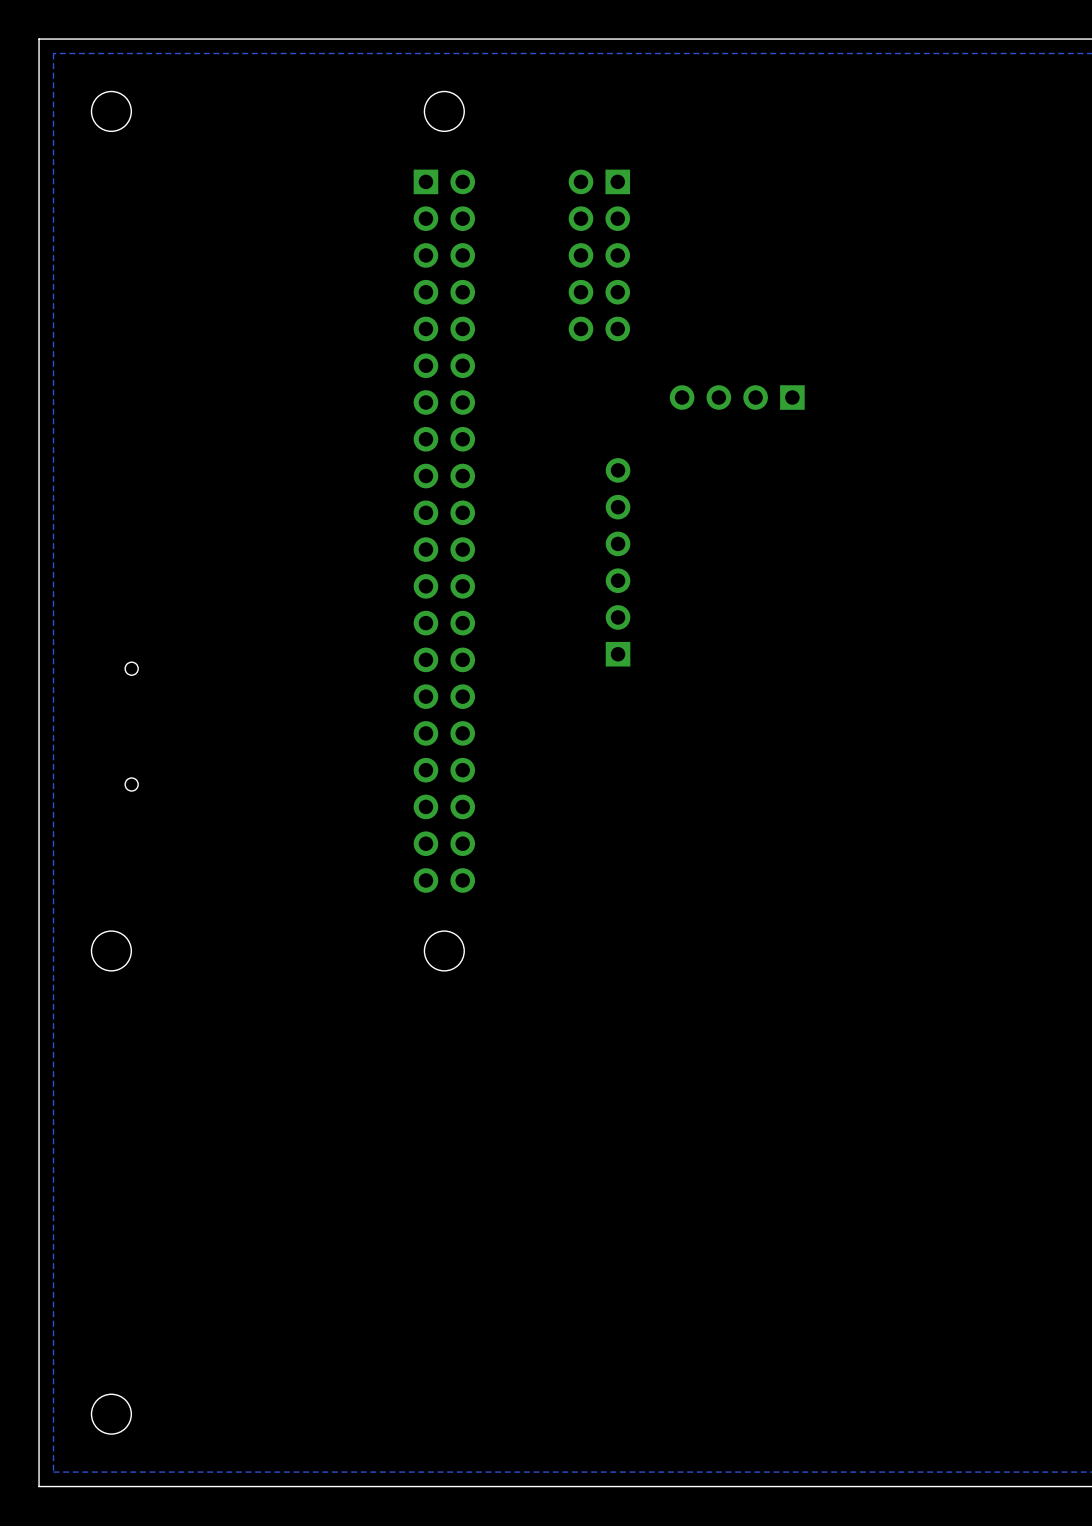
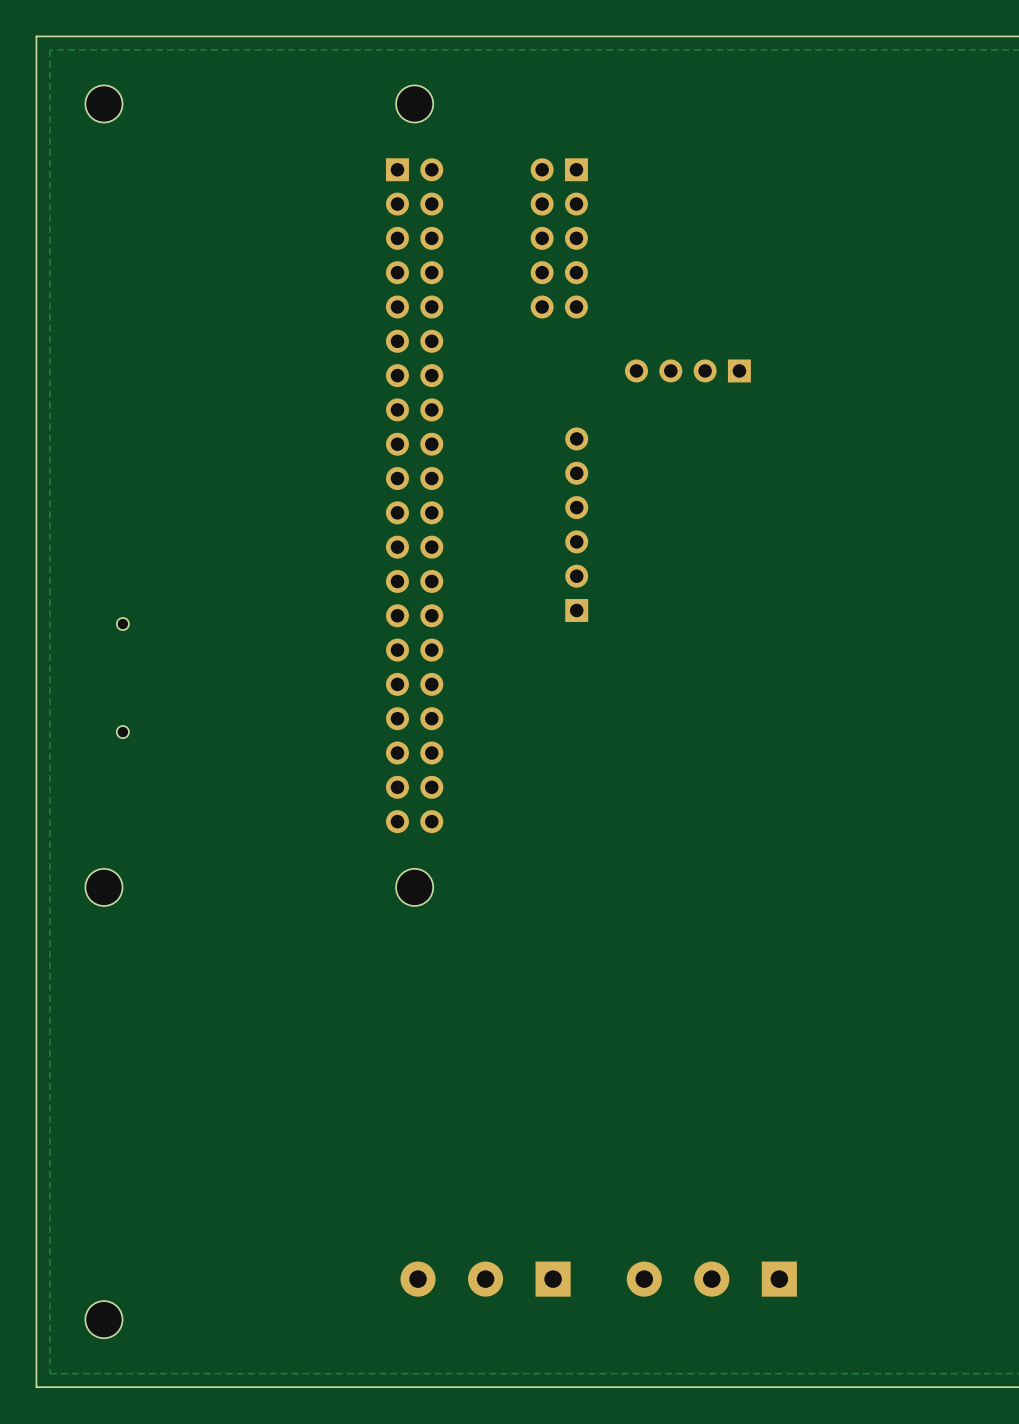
part: none -> (485, 1279)
part: none -> (711, 1279)

